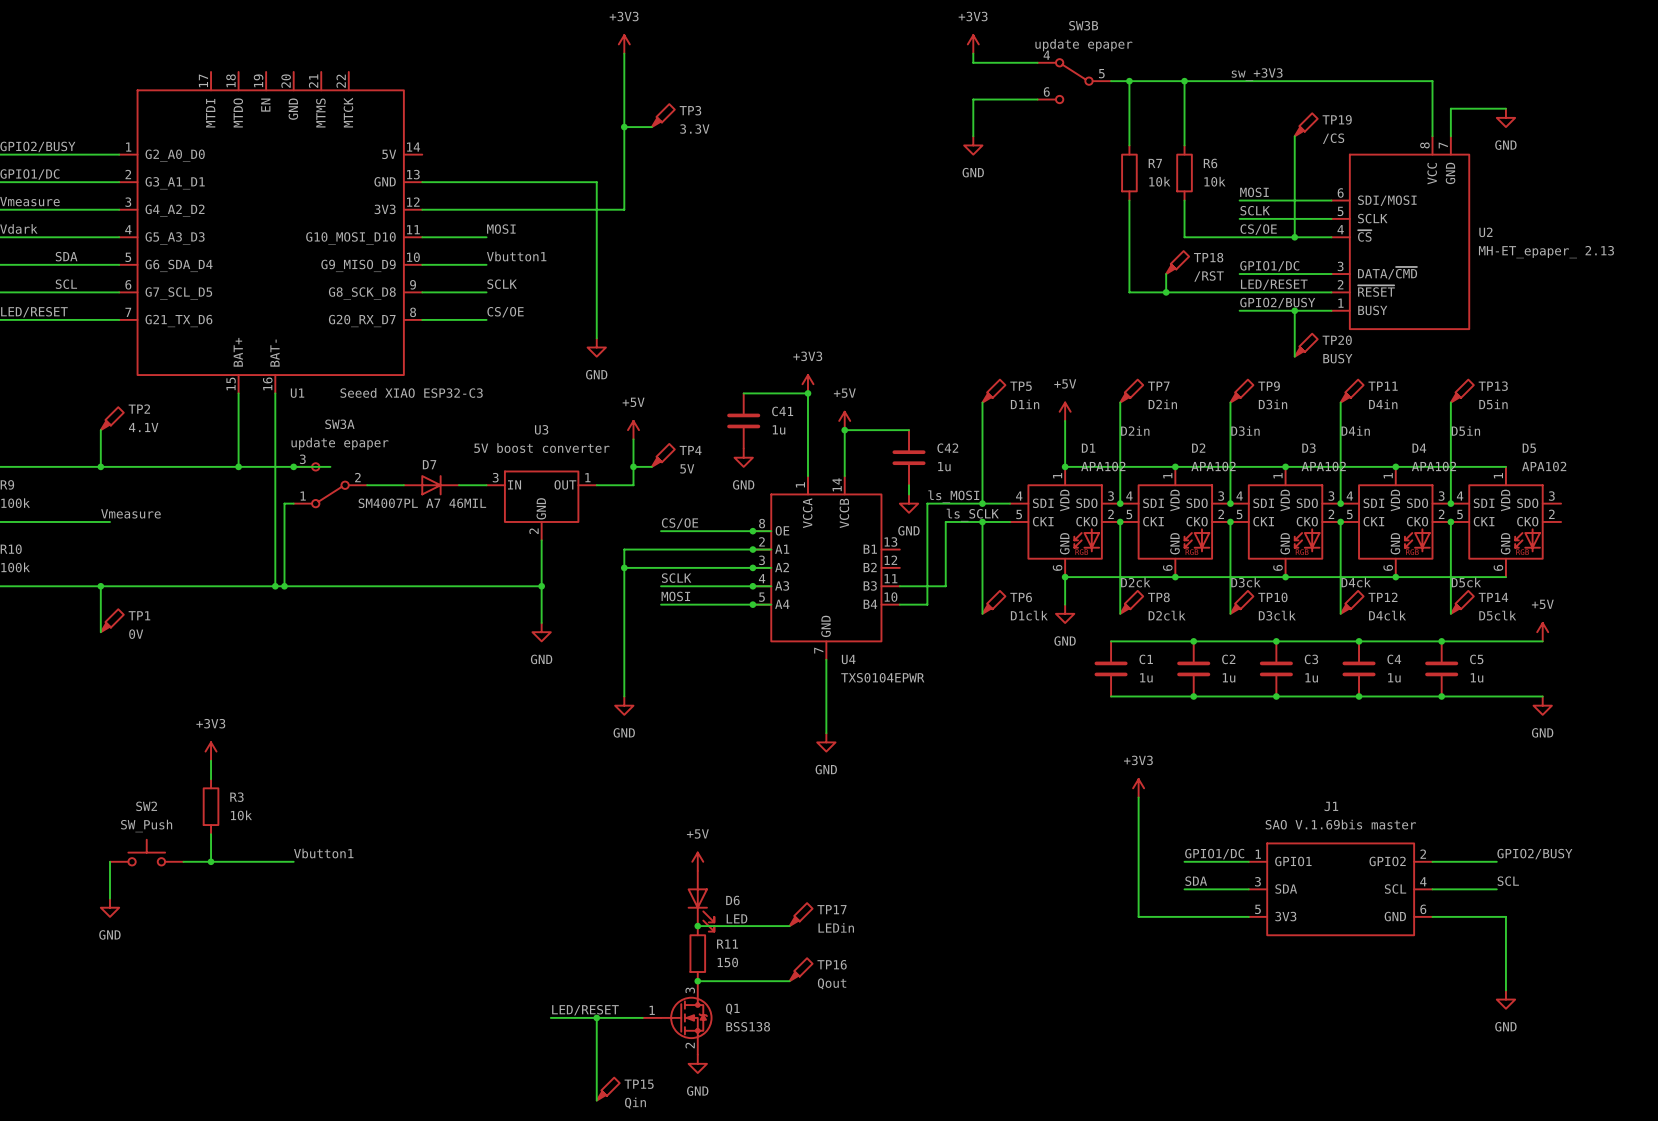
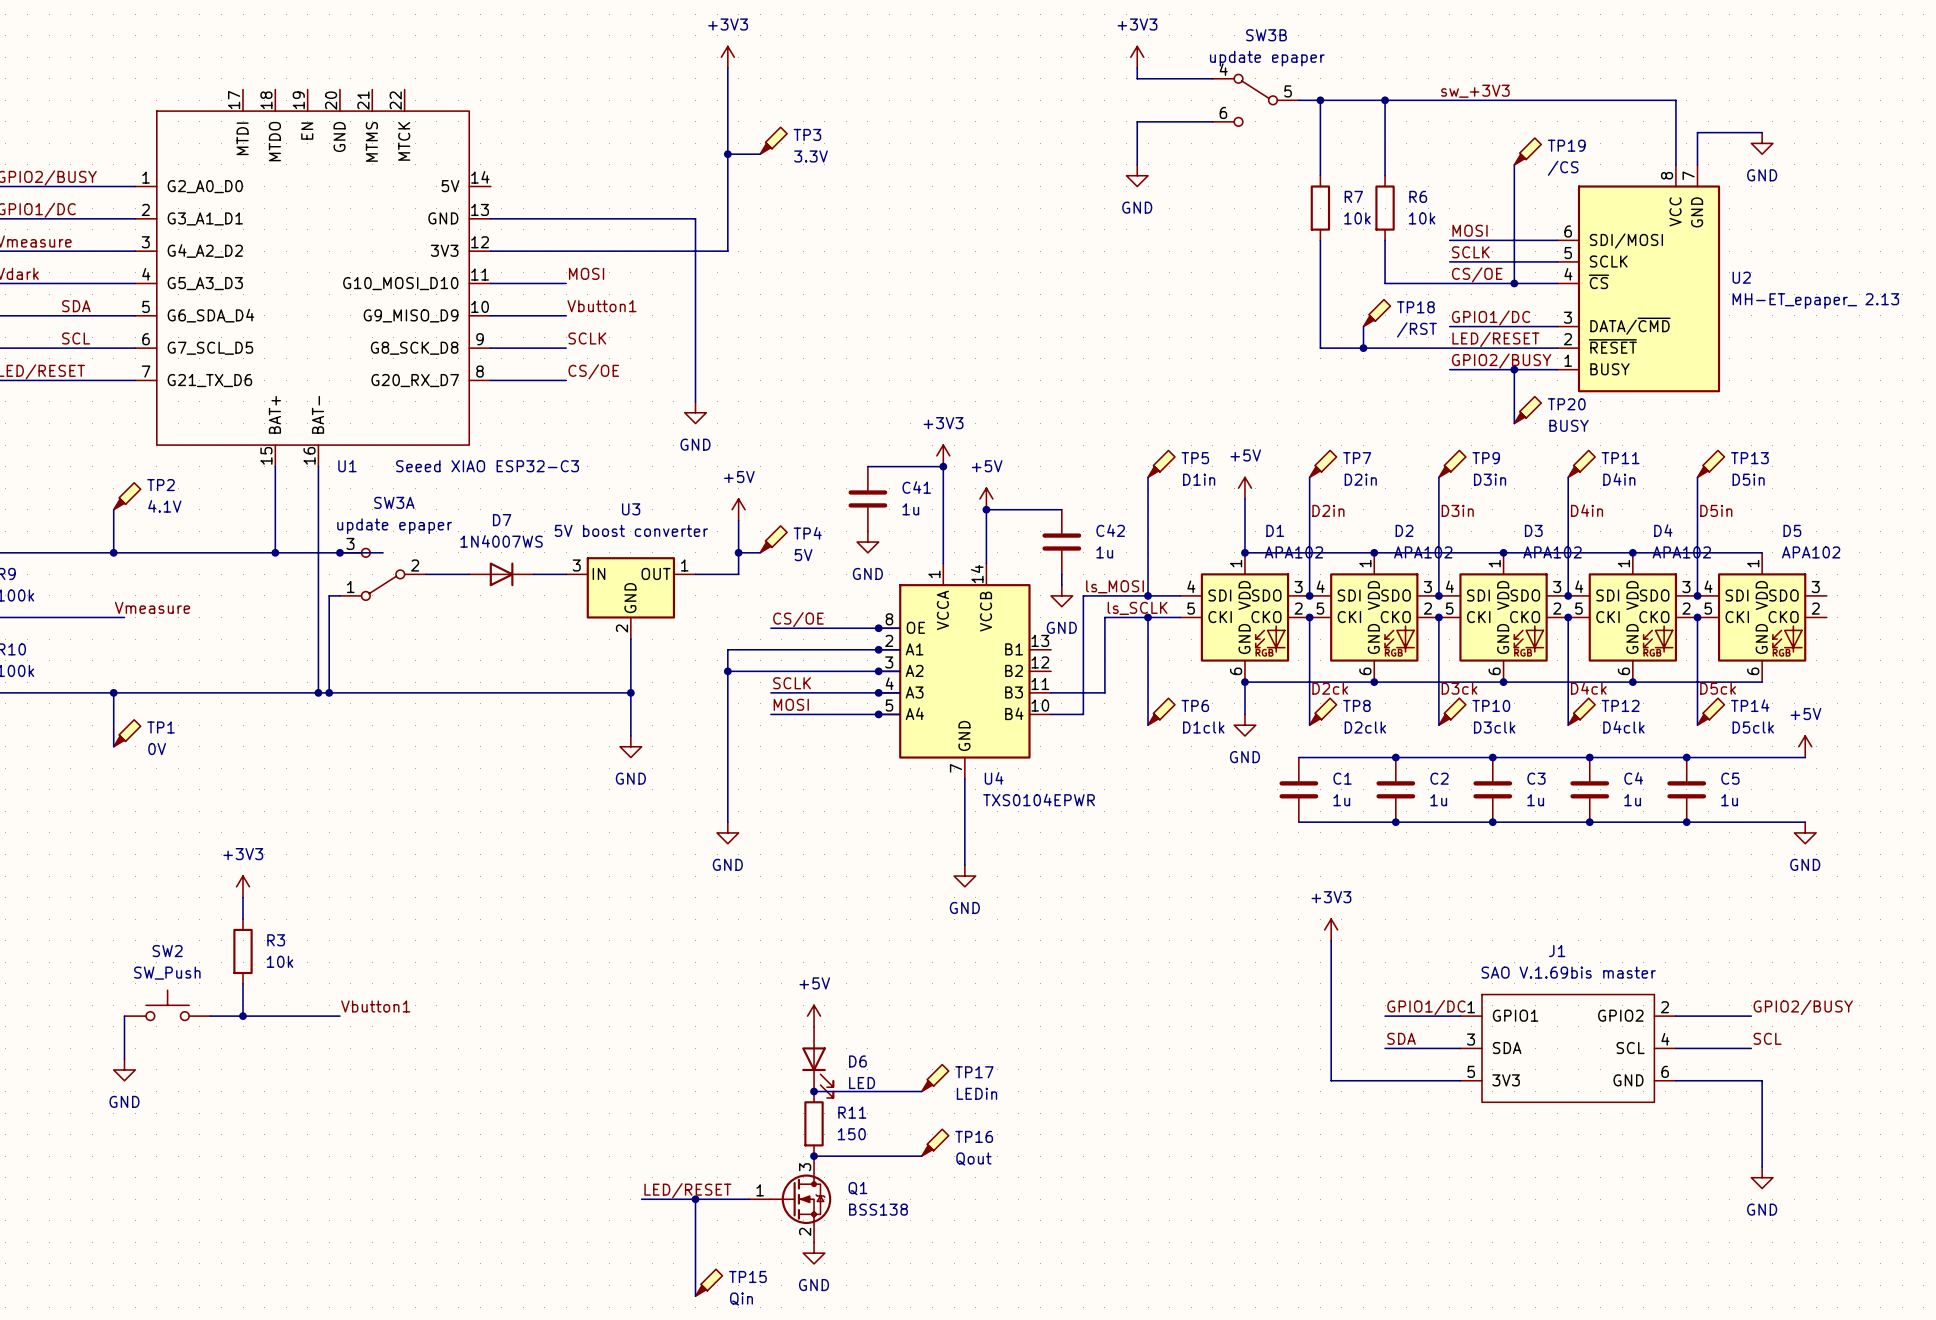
D7 name position: D7 (429, 464) -> D7 (502, 520)
D7 value: SM4007PL A7 46MIL (422, 503) -> 1N4007WS (501, 541)

